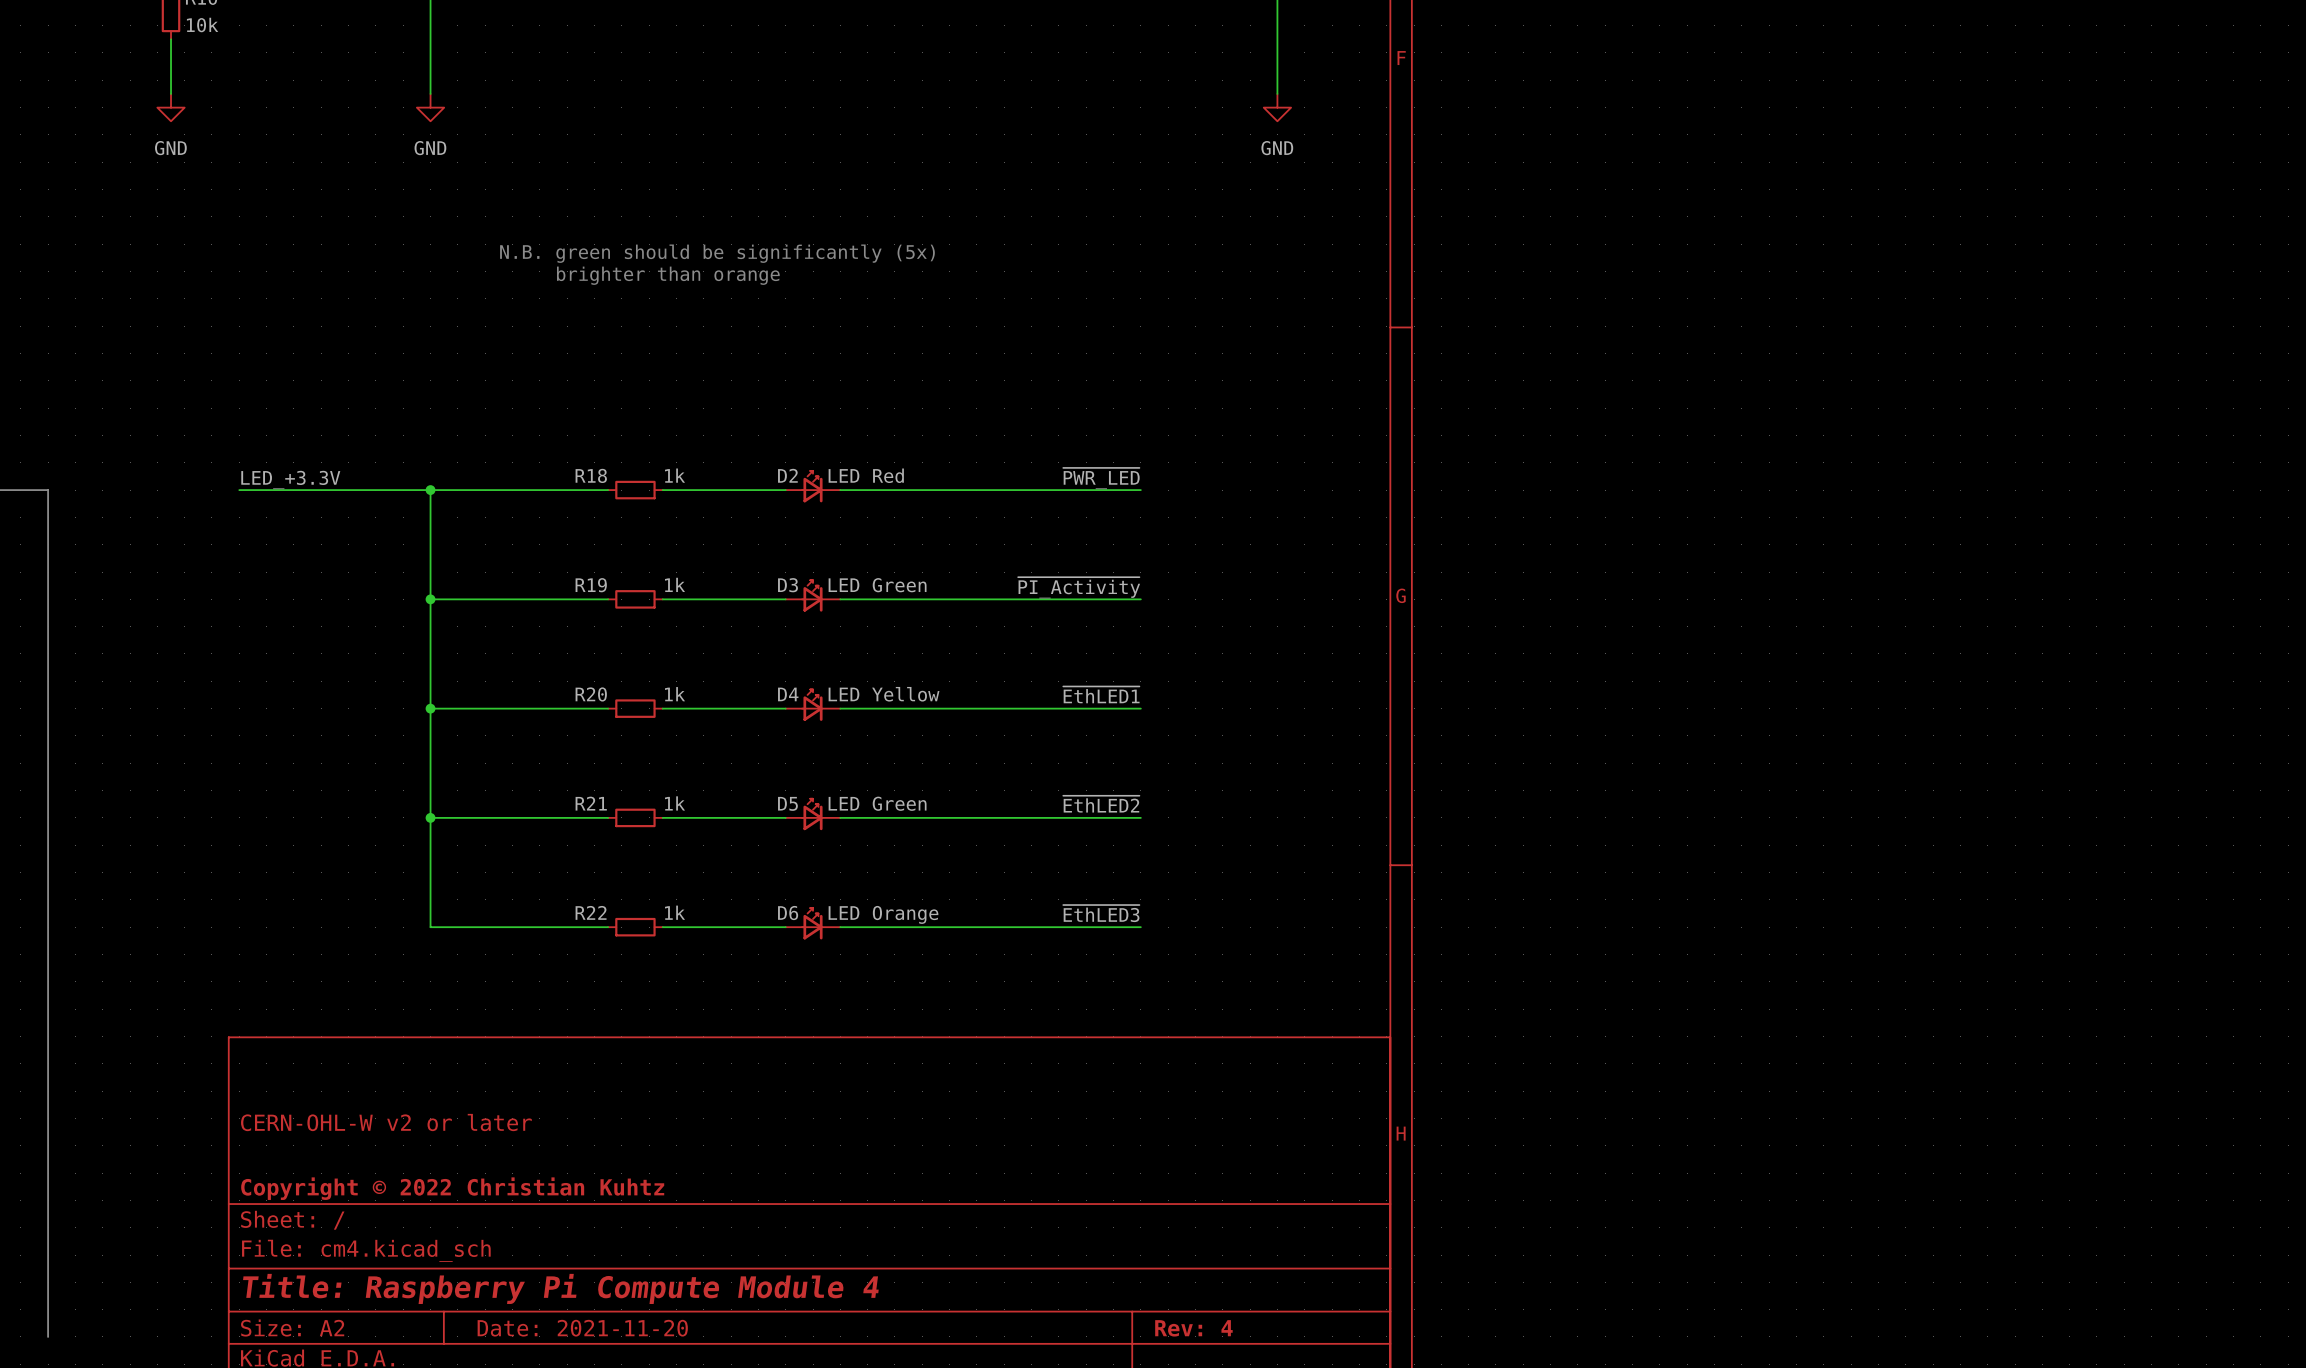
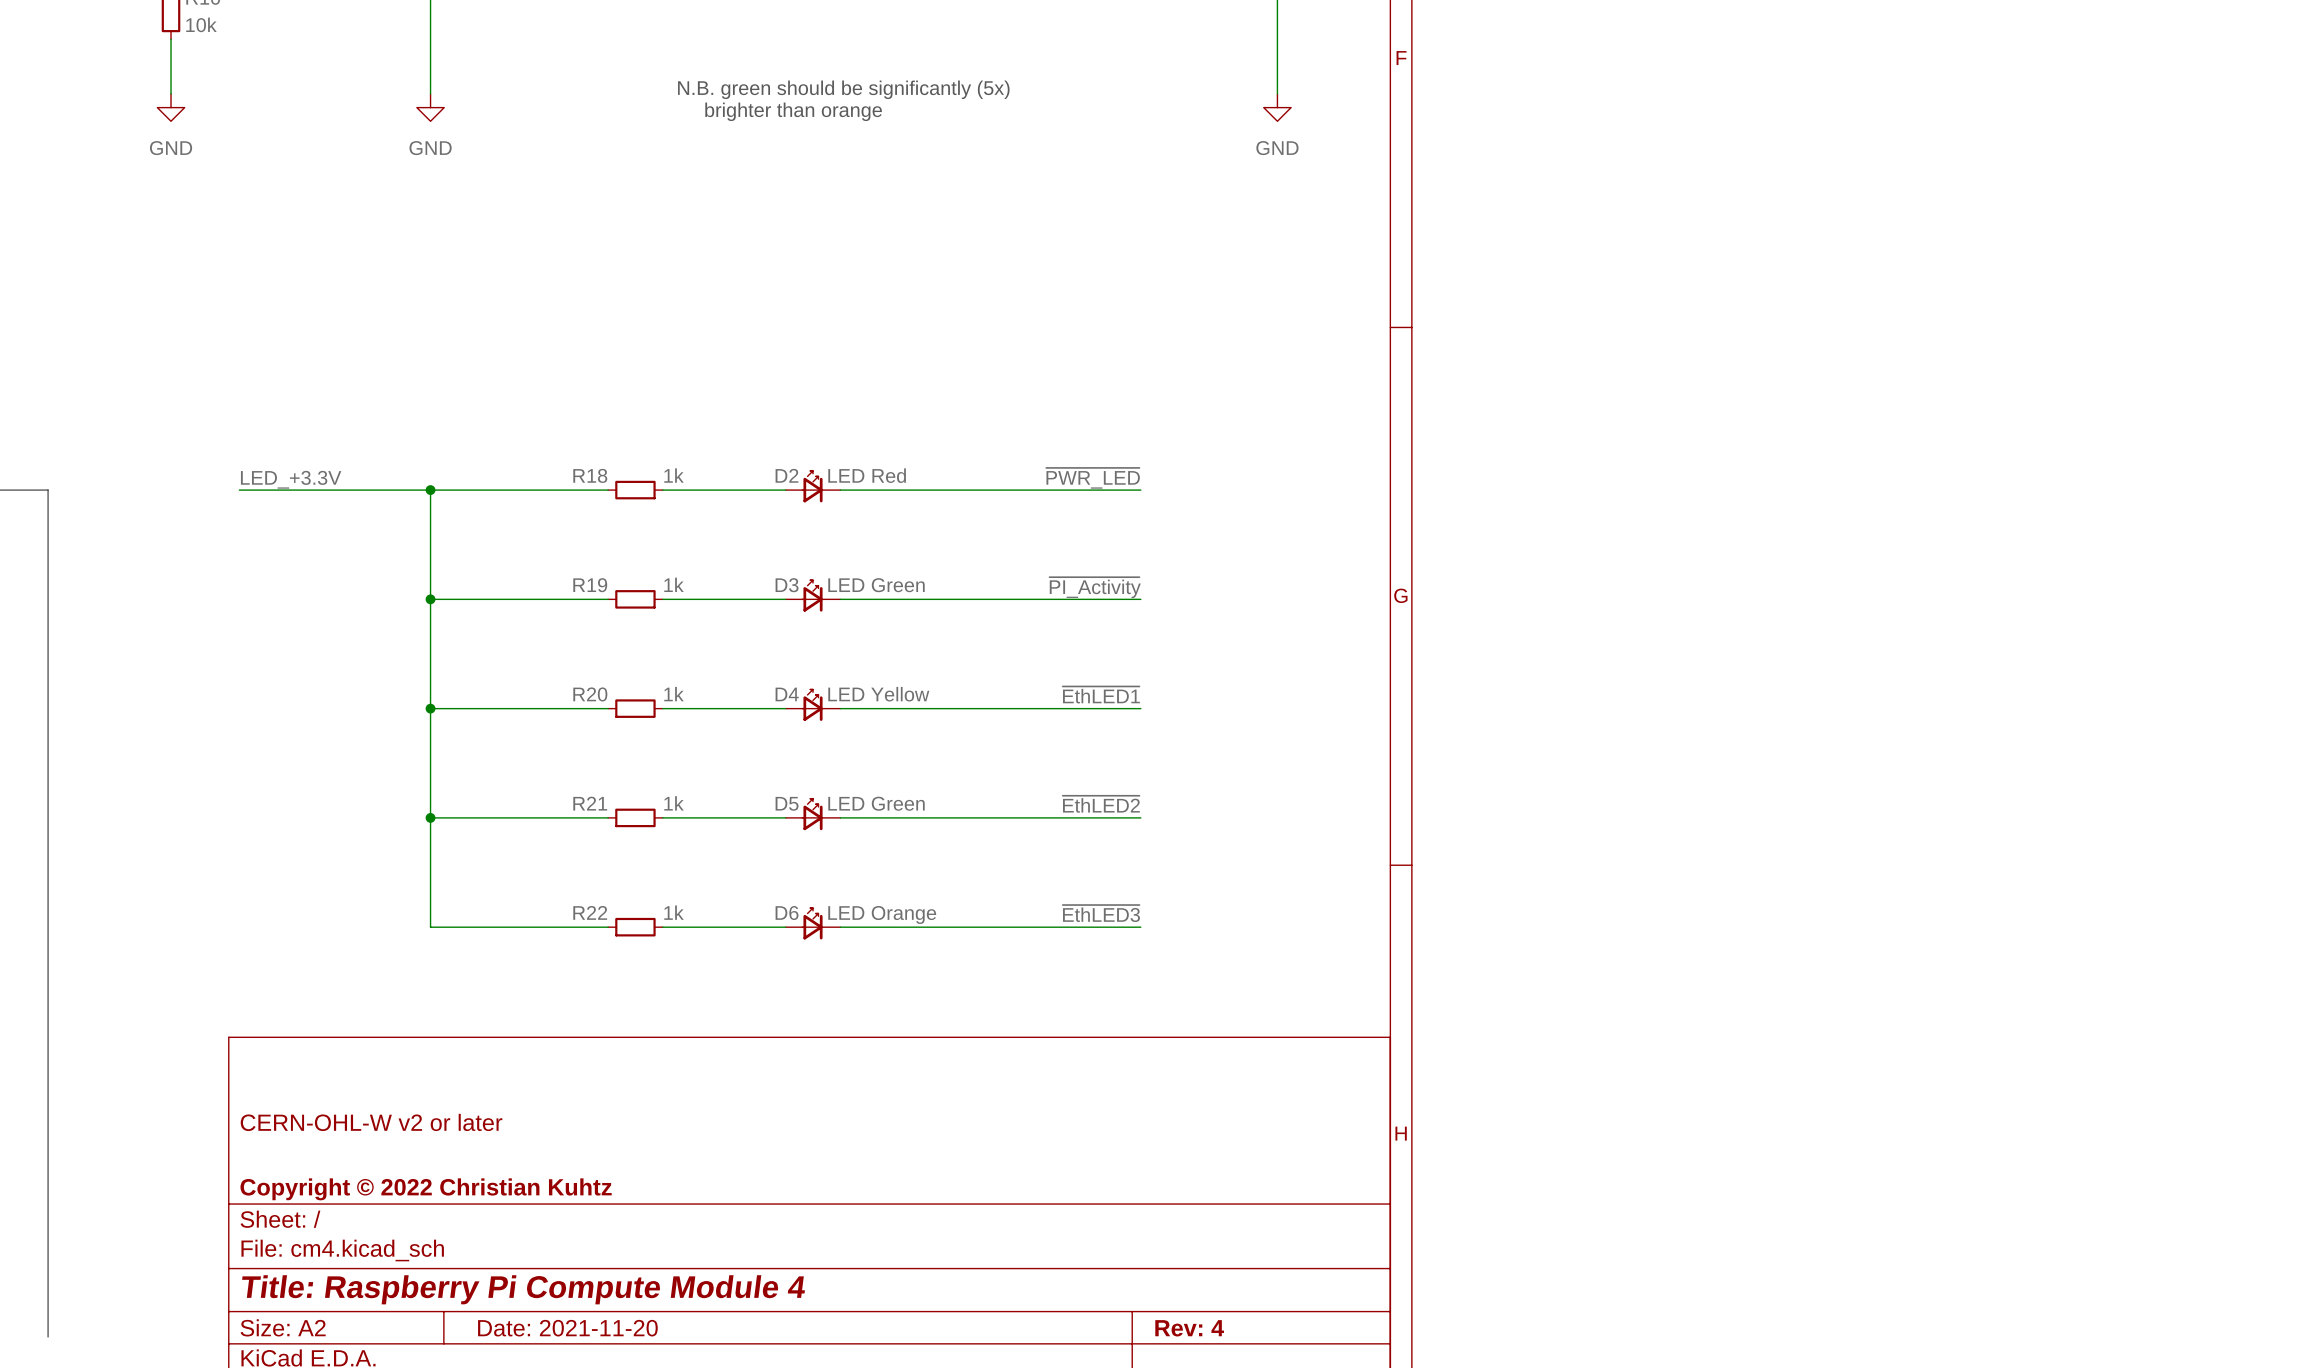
text position: N.B. green should be significantly (5x) (717, 253) -> N.B. green should be significantly (5x) (843, 89)
text position: brighter than orange (668, 275) -> brighter than orange (793, 111)

